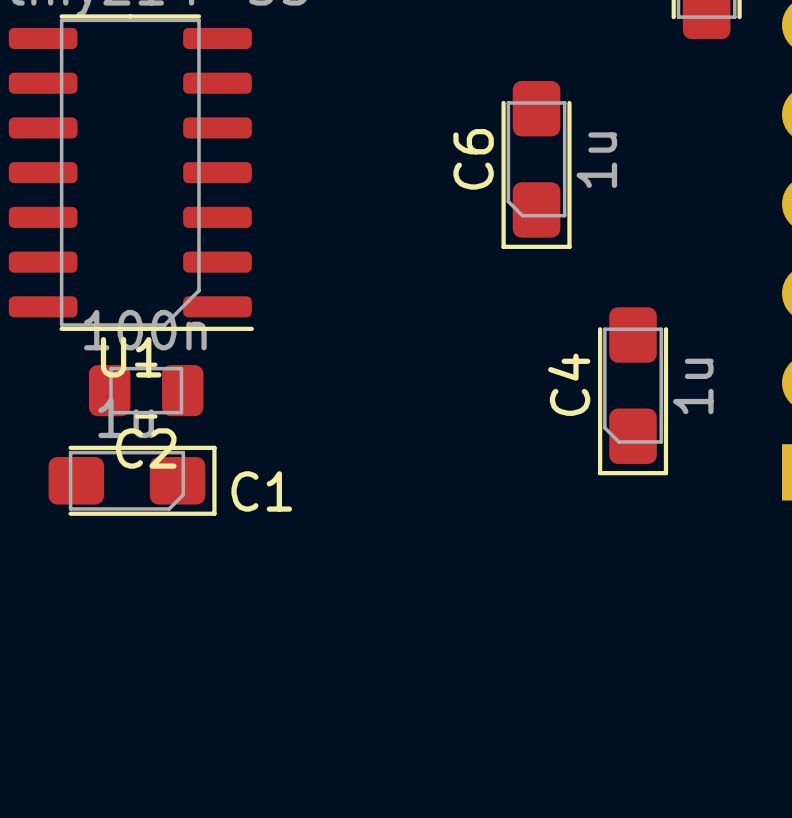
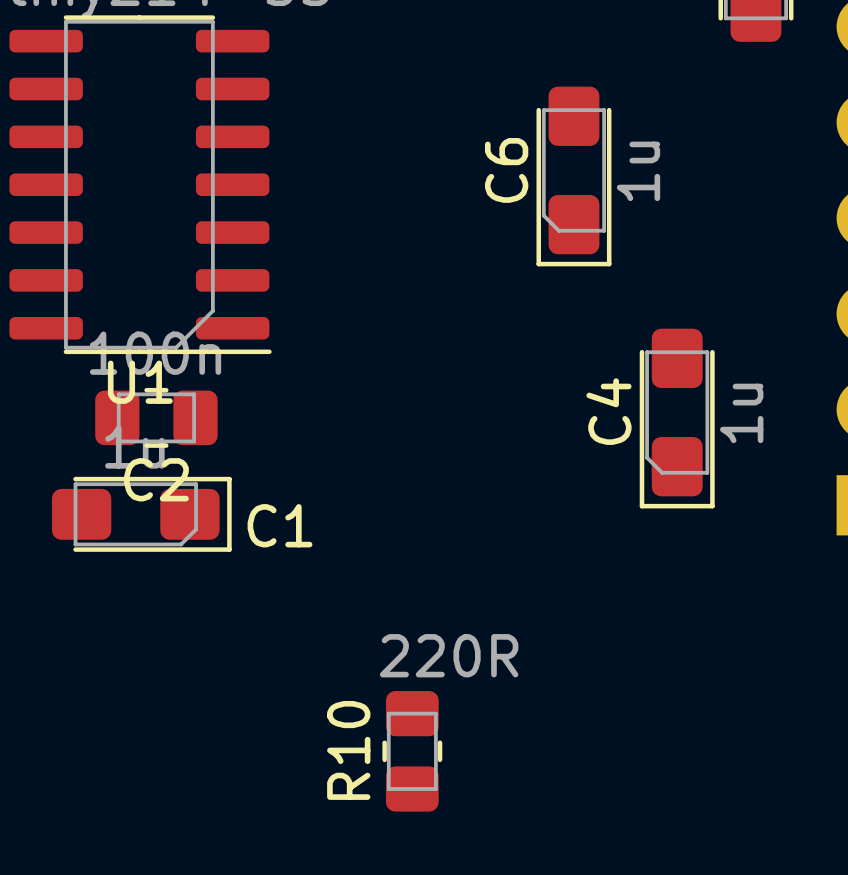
R10: none -> 220R (412, 751)

